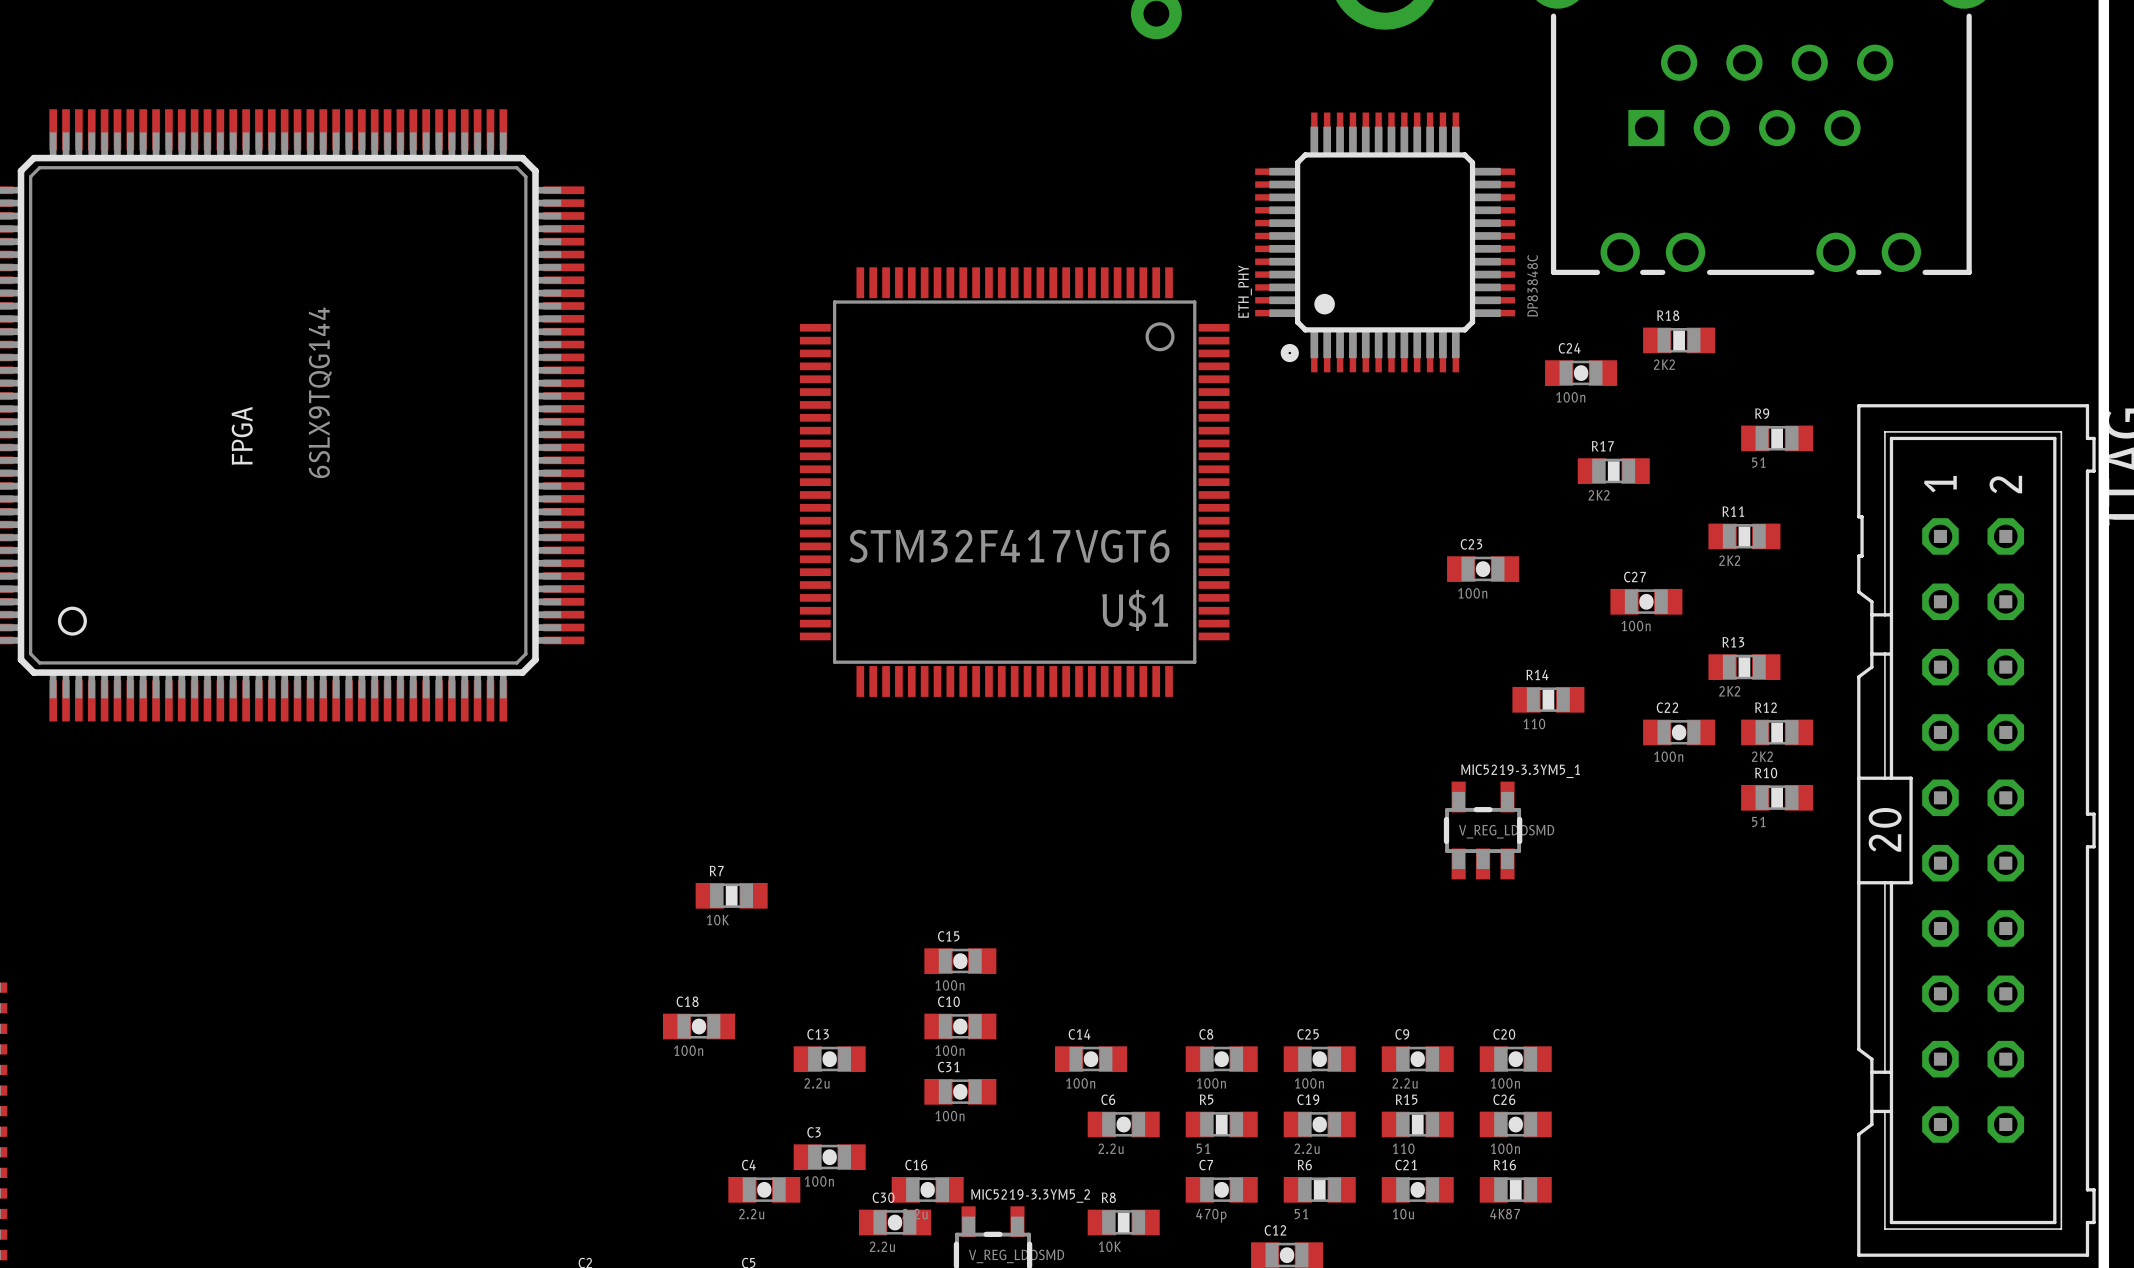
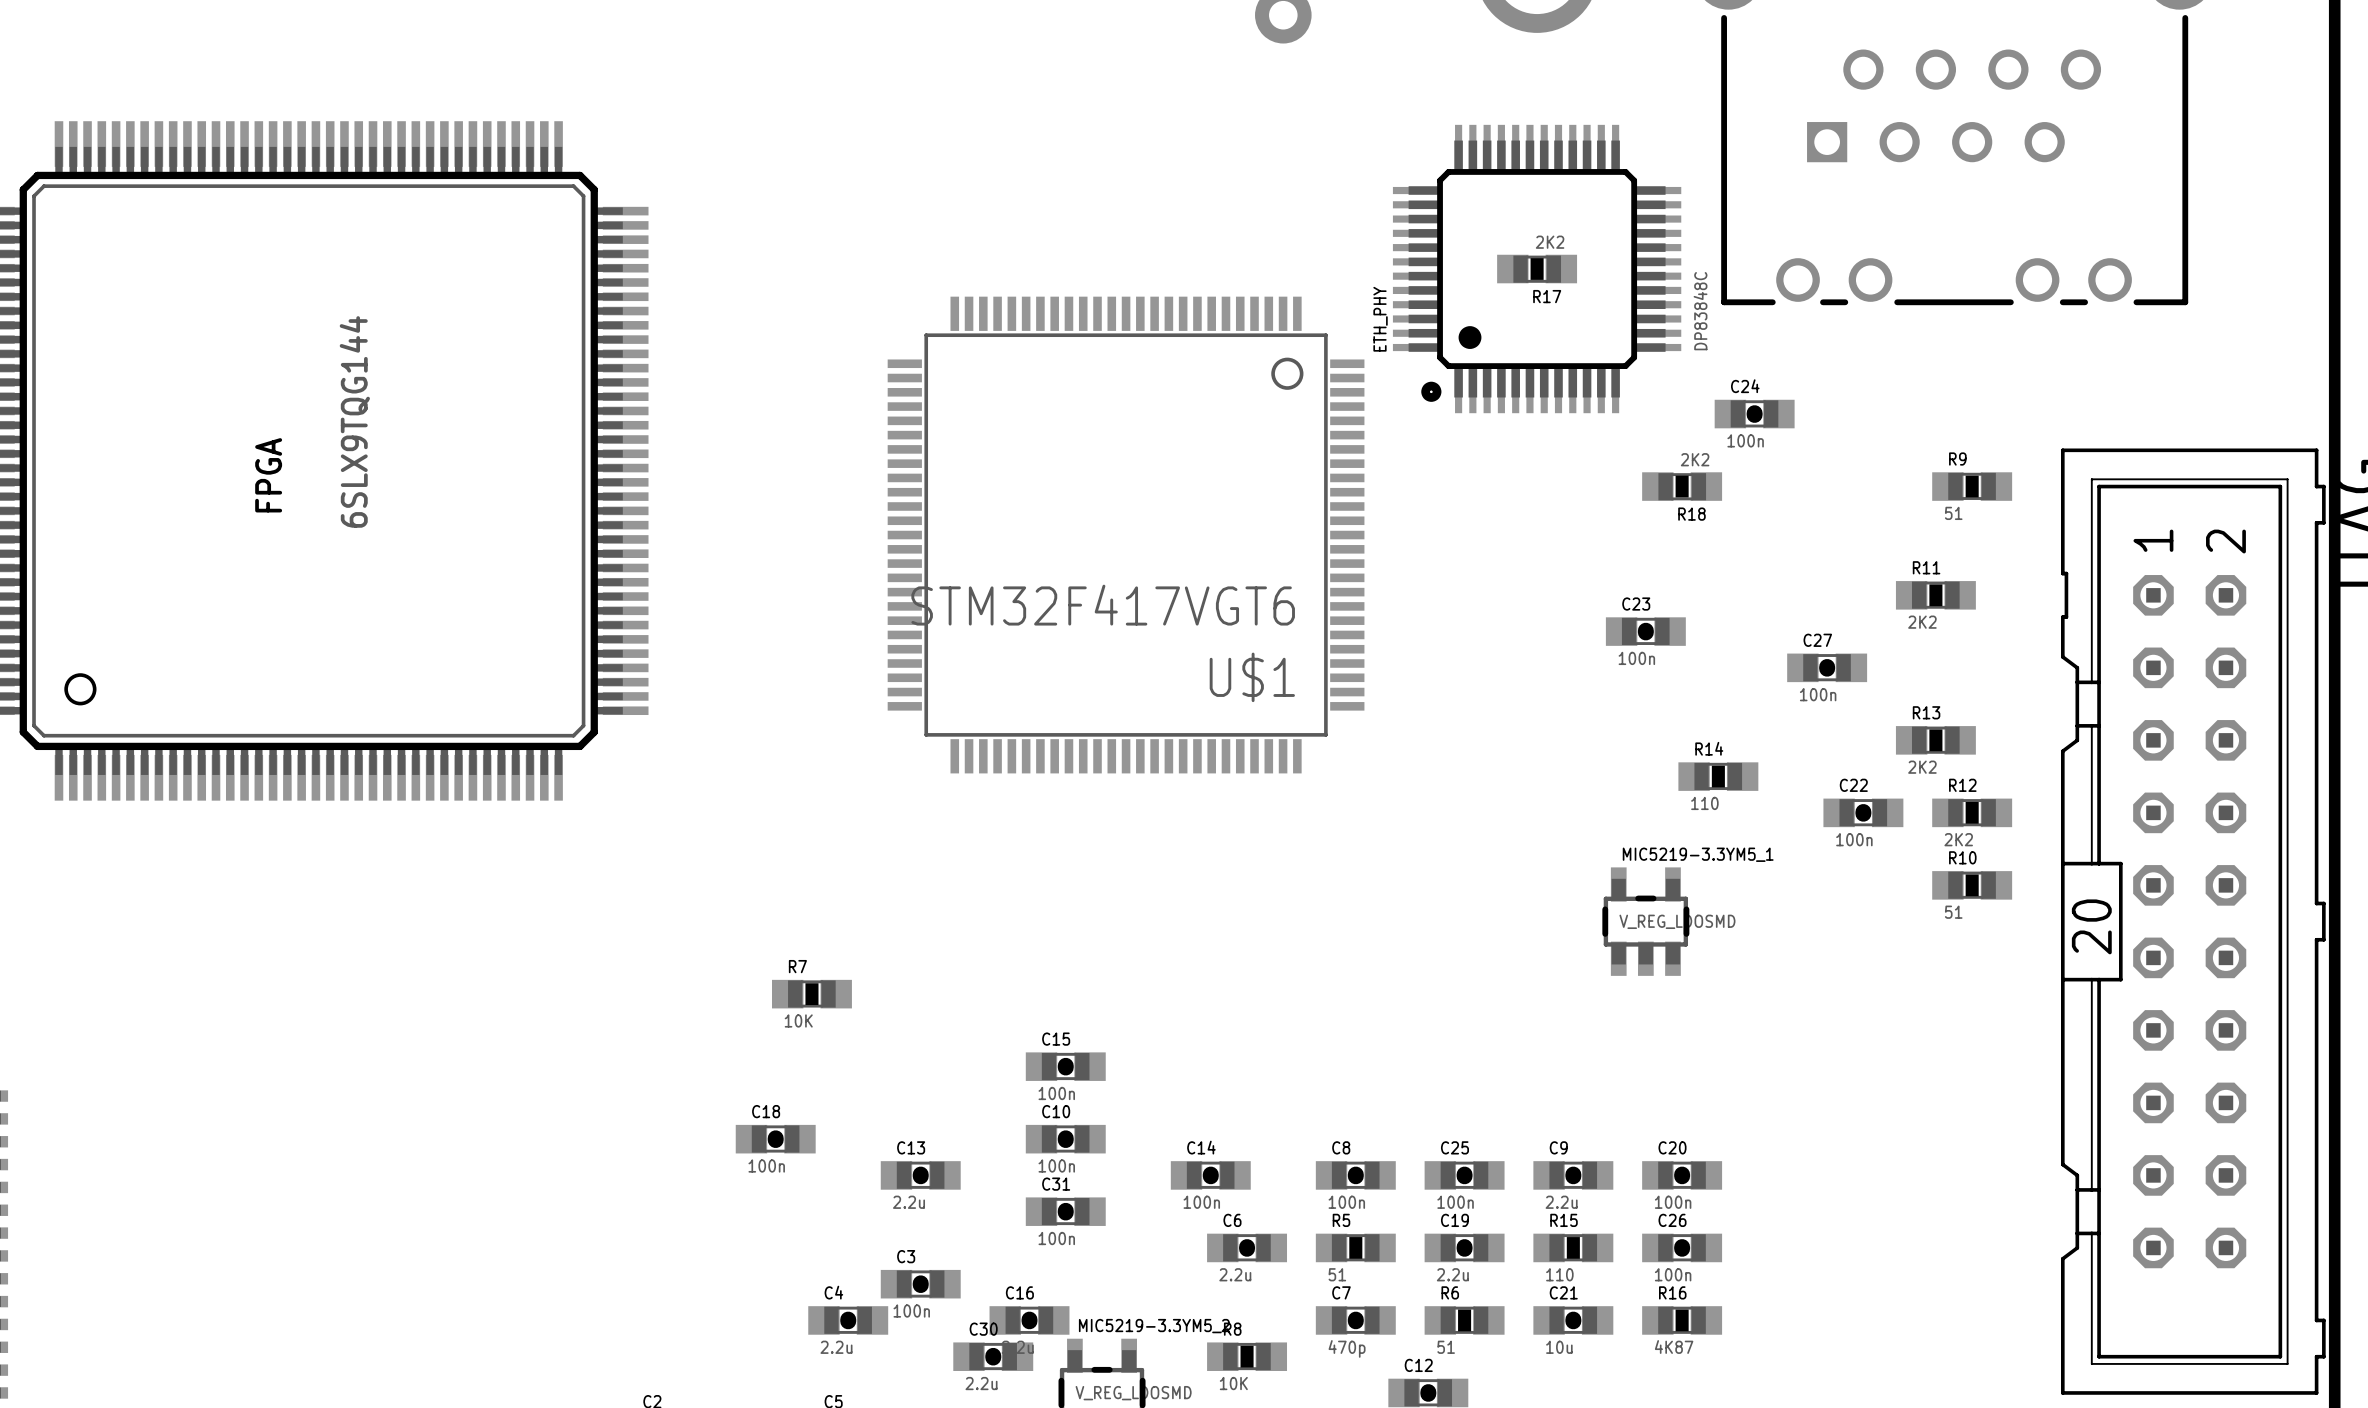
R18 name position: R18 (1668, 315) -> R18 (1691, 514)
R18 position: (1679, 340) -> (1682, 486)
R18 value position: 2K2 (1664, 364) -> 2K2 (1695, 459)
R17 name position: R17 (1602, 446) -> R17 (1547, 296)
R17 position: (1613, 471) -> (1537, 269)
R17 value position: 2K2 (1599, 495) -> 2K2 (1550, 242)

